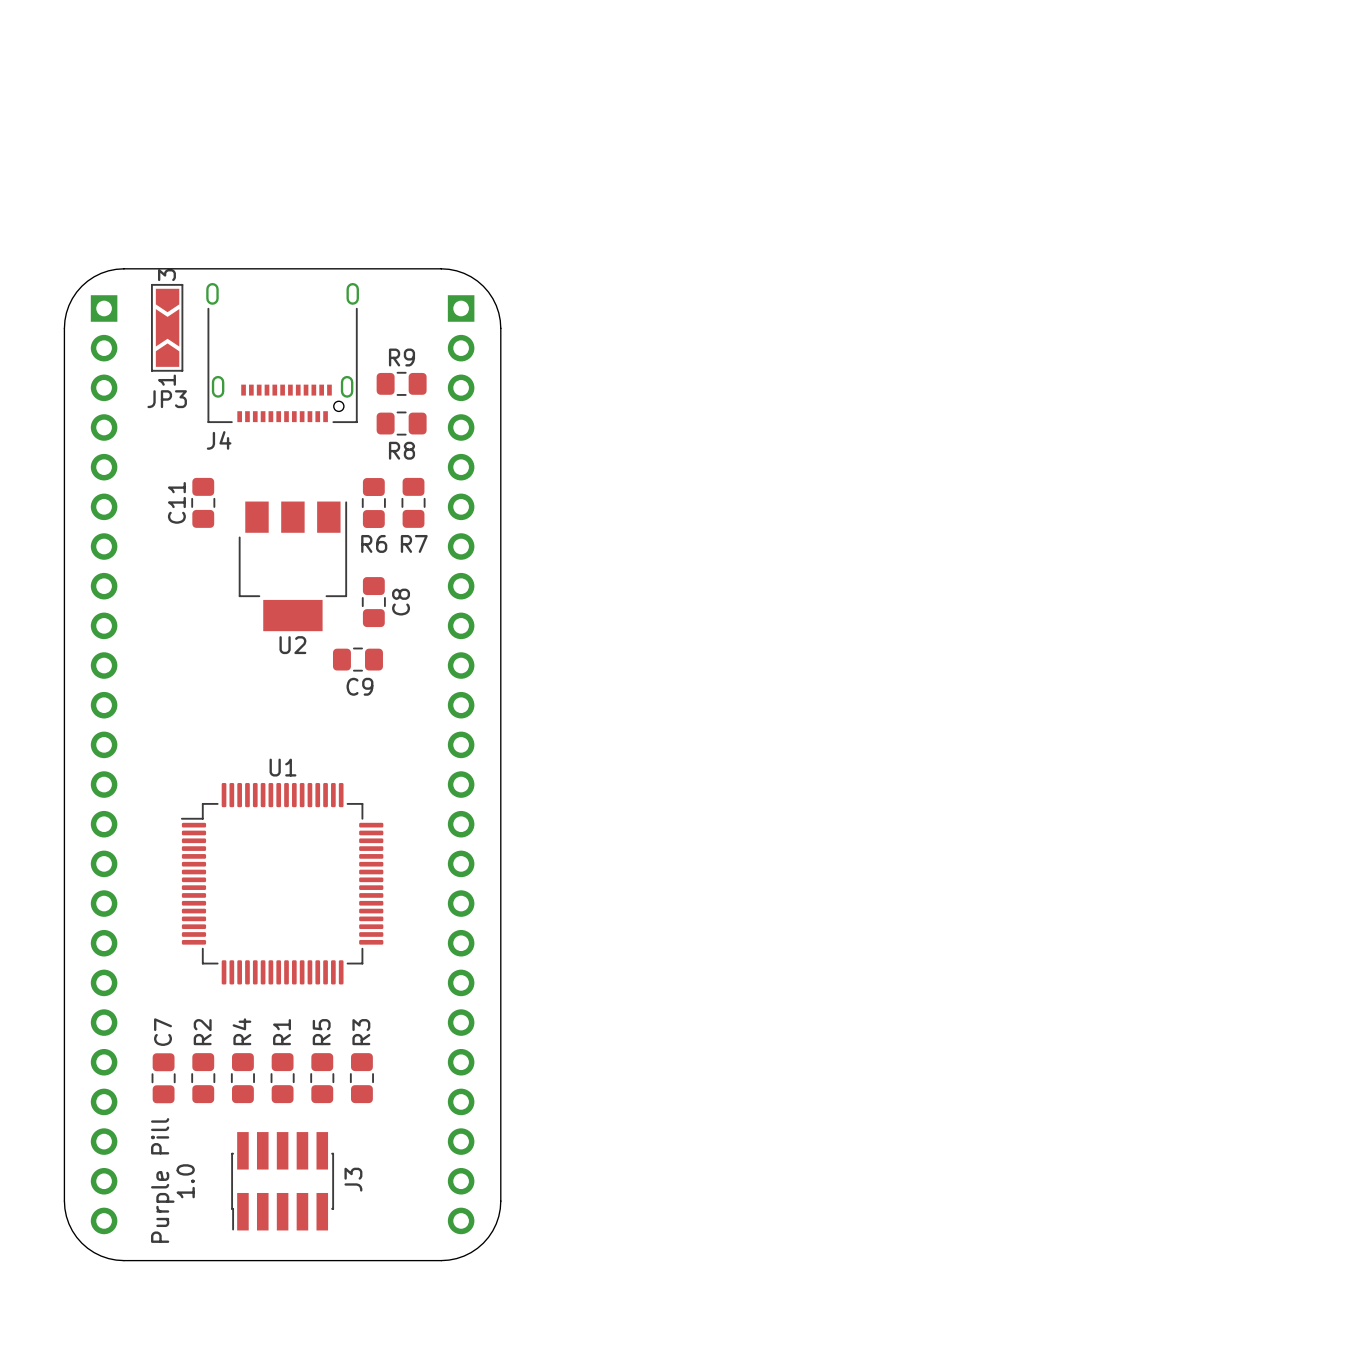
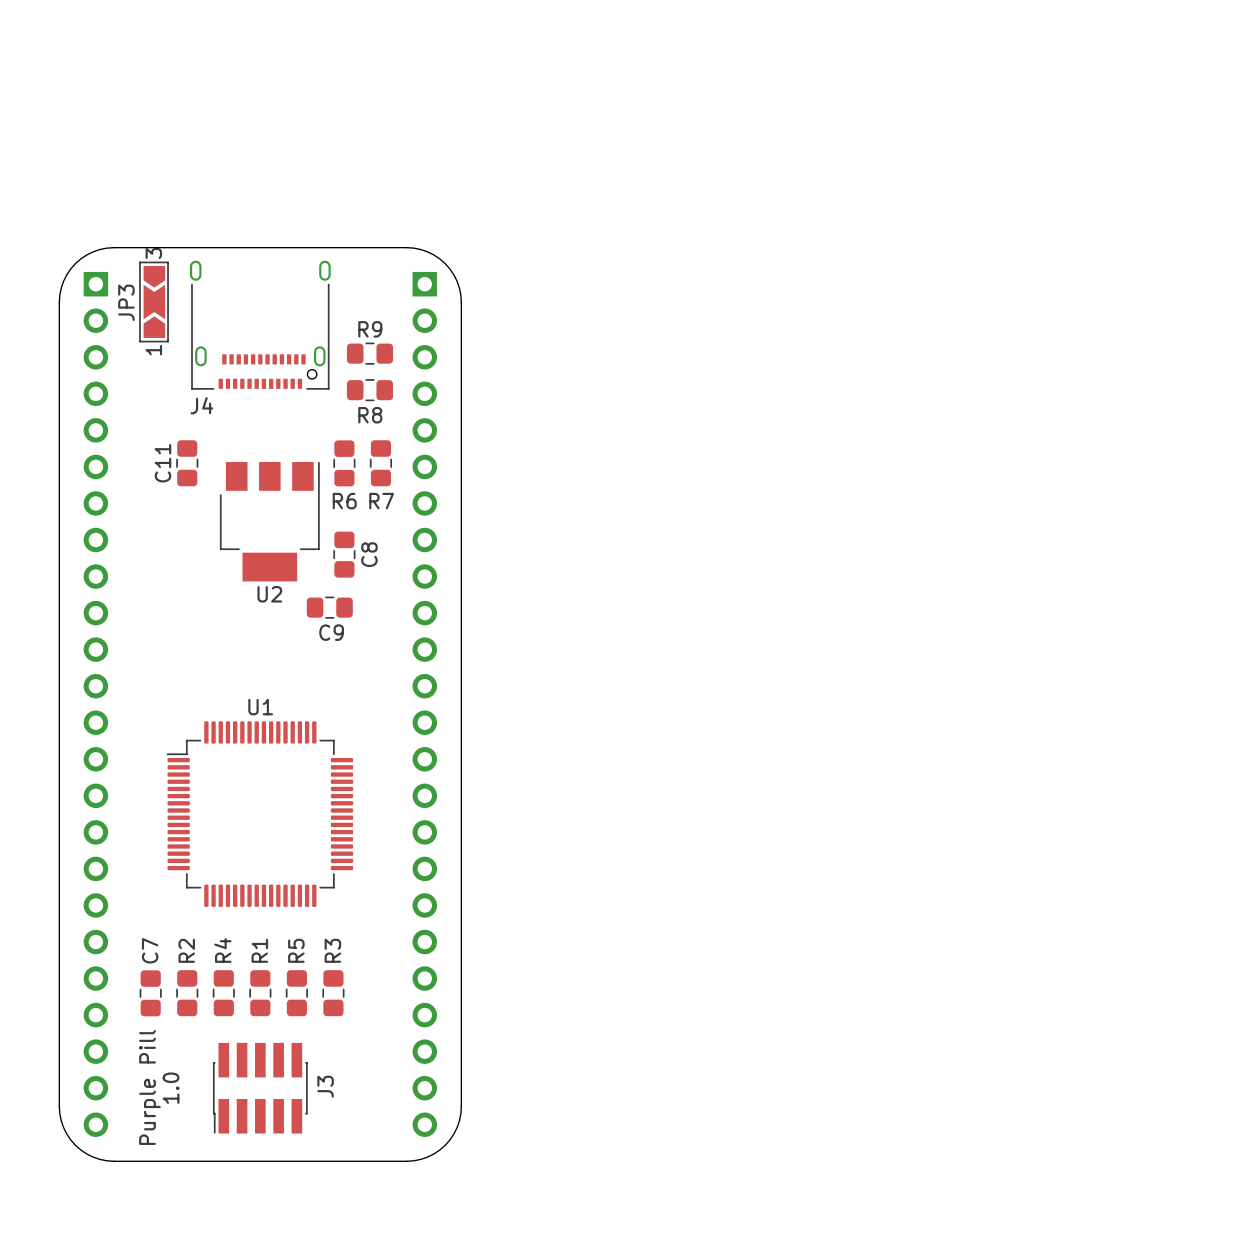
JP3 name rotation: 0° (167, 399) -> 90° counterclockwise (126, 302)
JP3 name position: JP3 (167, 399) -> JP3 (126, 302)

